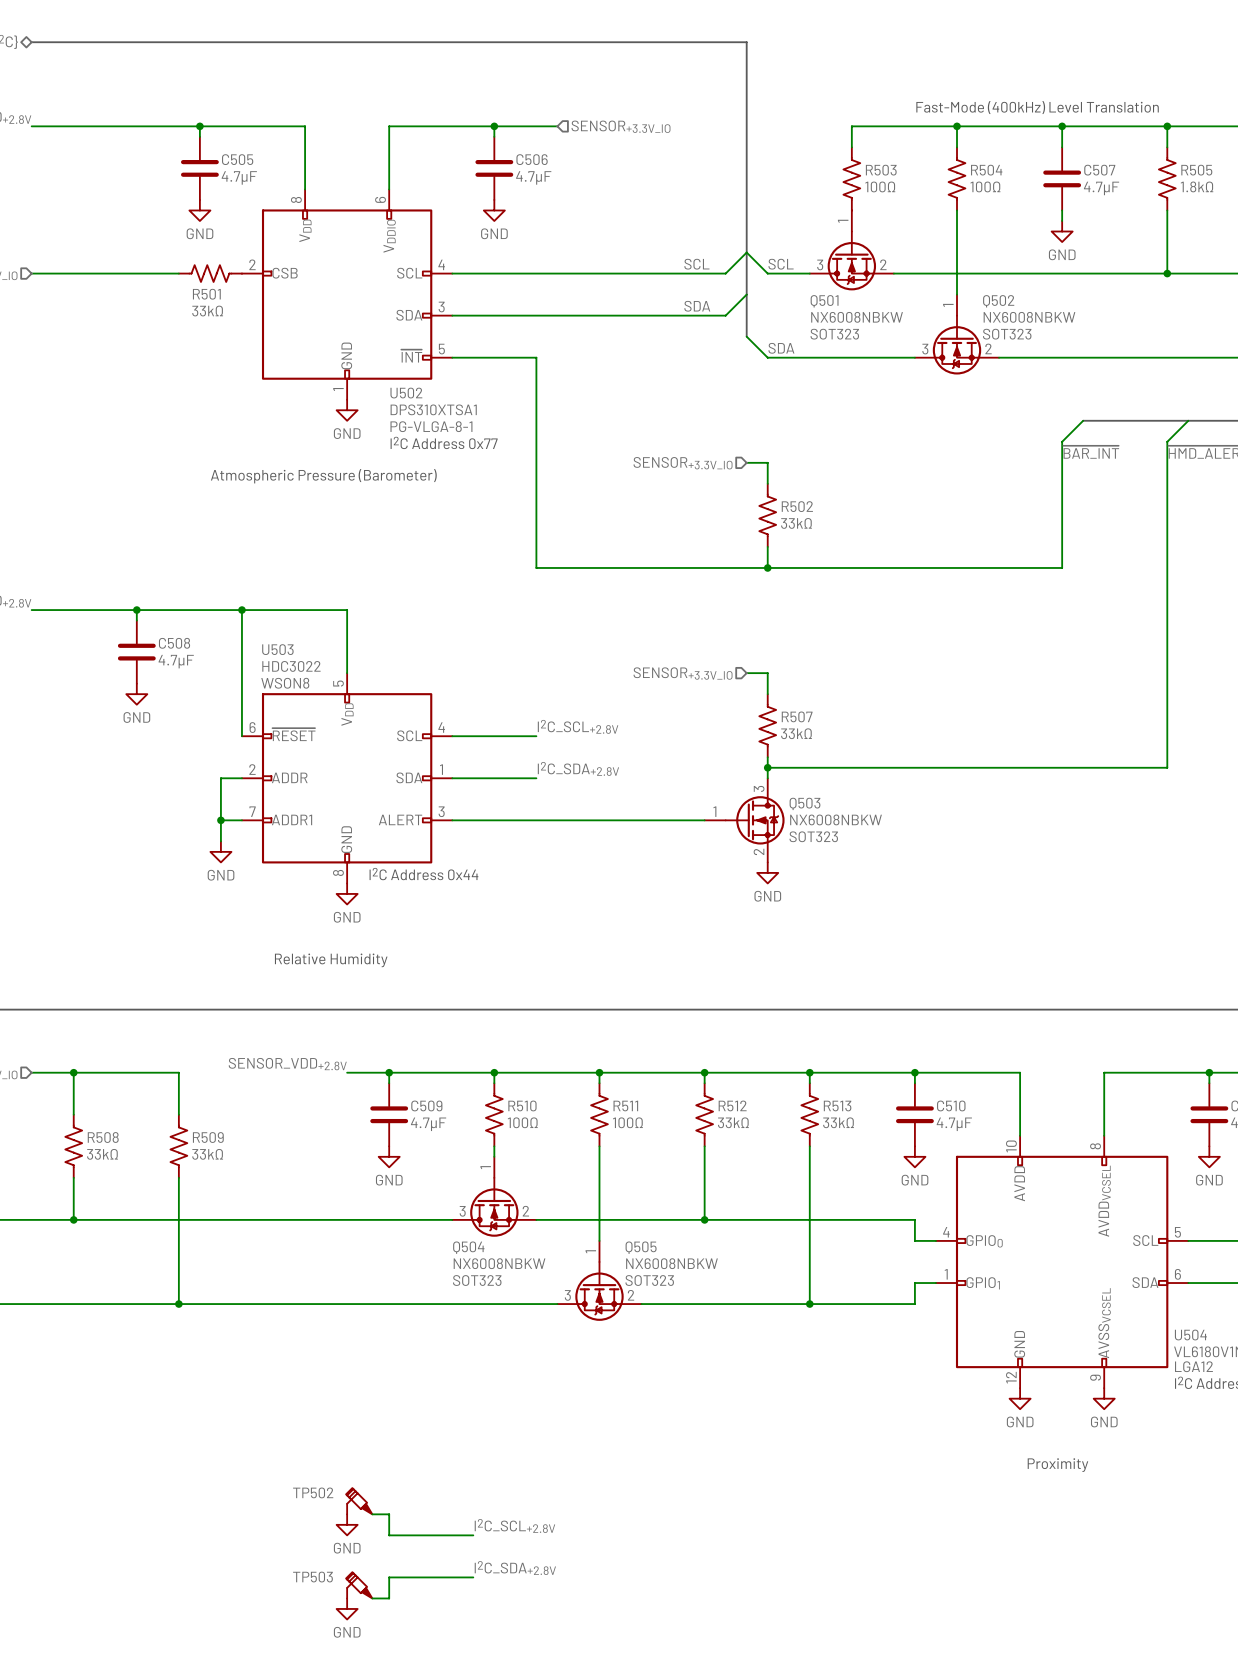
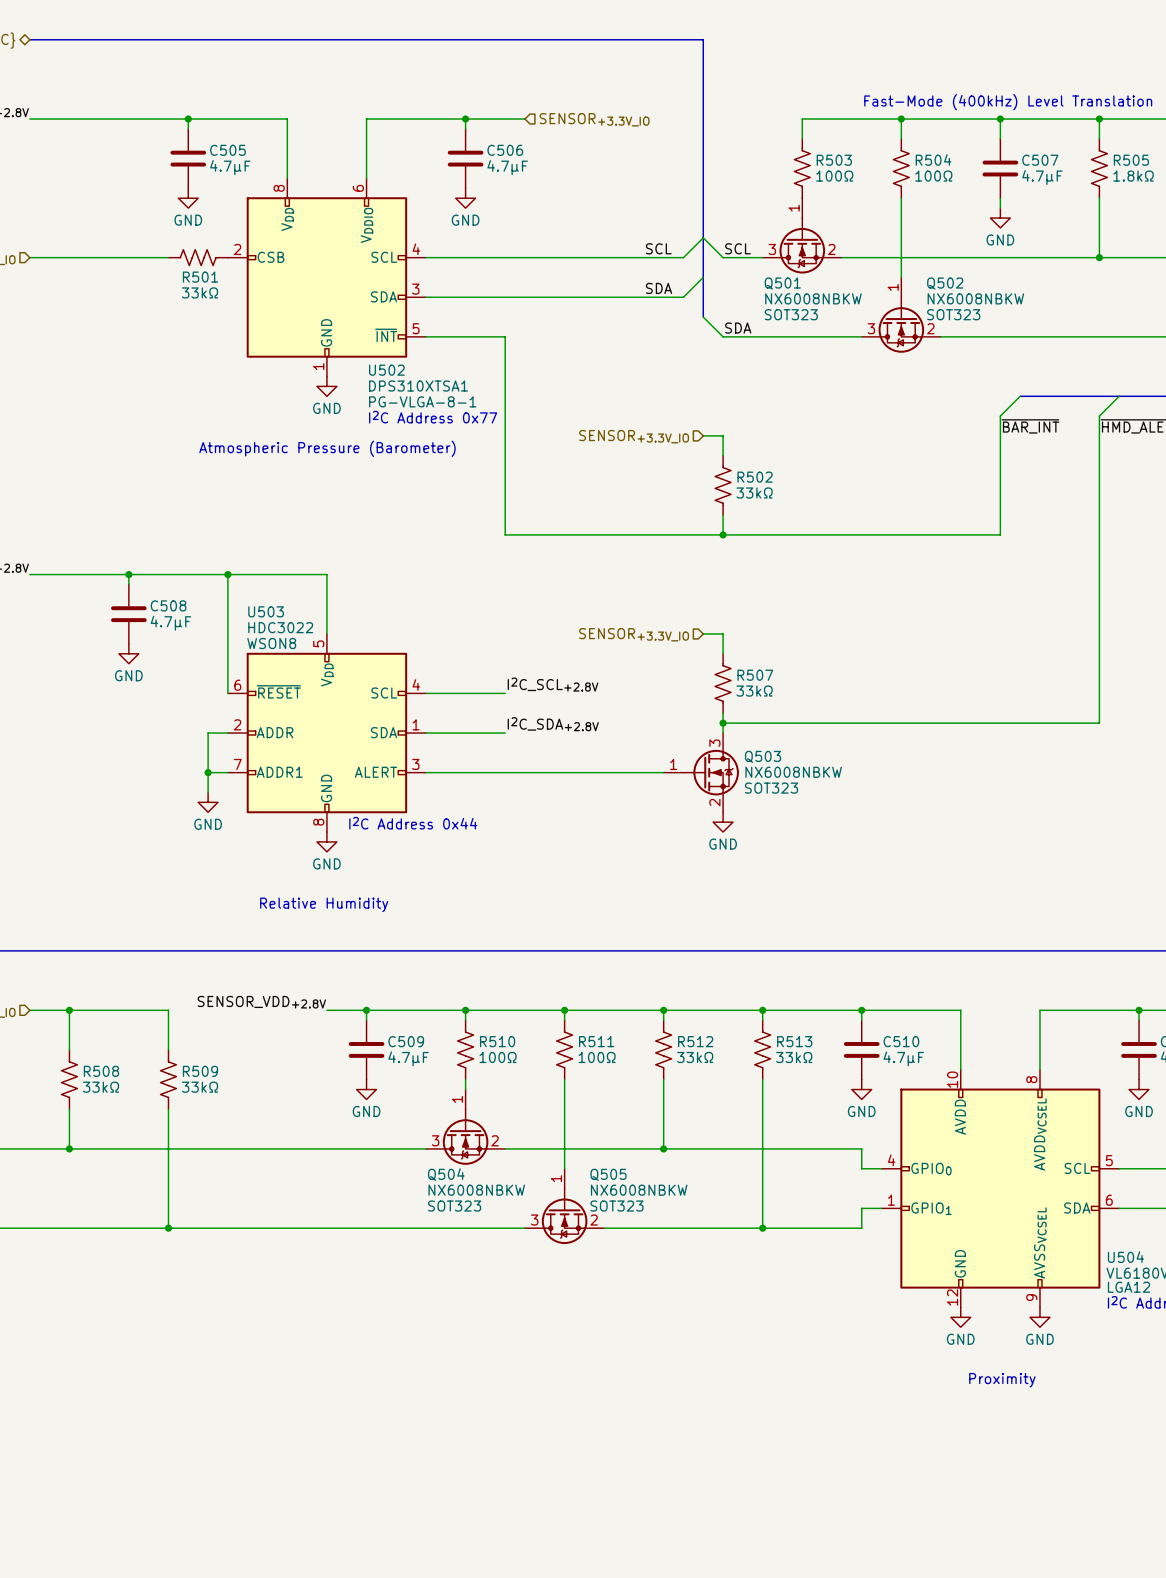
TP502: (359, 1501) -> none
wire: (372, 1514) (389, 1514) (389, 1535) (473, 1535) -> none
power symbol: GND (347, 1524) -> none
label: I2C_SCL+2.8V (514, 1525) -> none
label: I2C_SDA+2.8V (515, 1568) -> none
wire: (473, 1577) (389, 1577) (389, 1598) (372, 1598) -> none
TP503: (359, 1585) -> none
power symbol: GND (347, 1608) -> none

